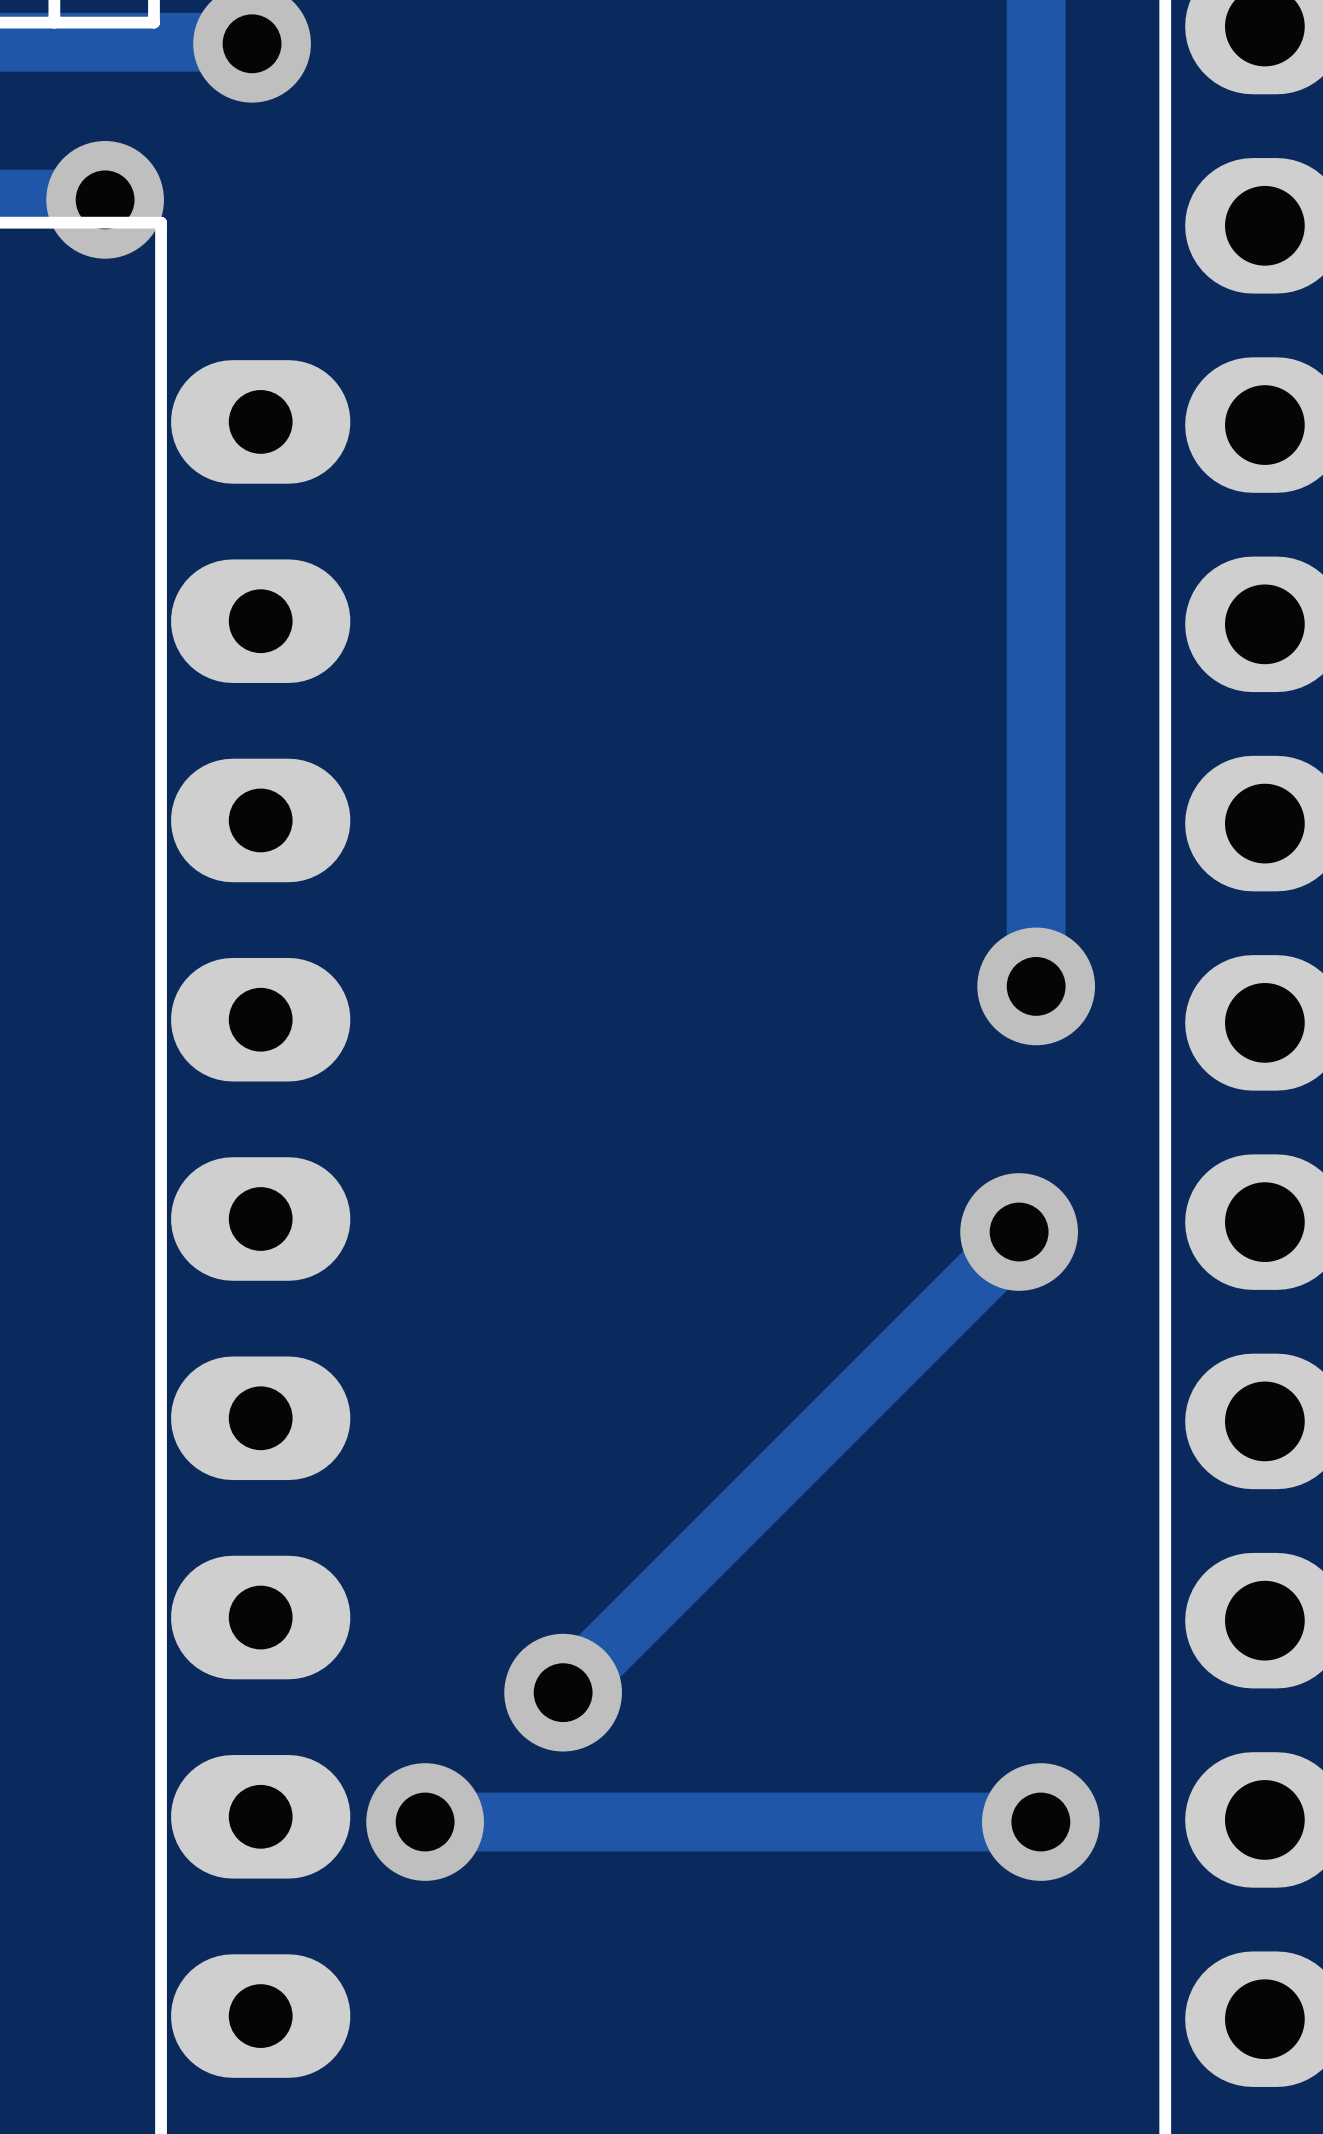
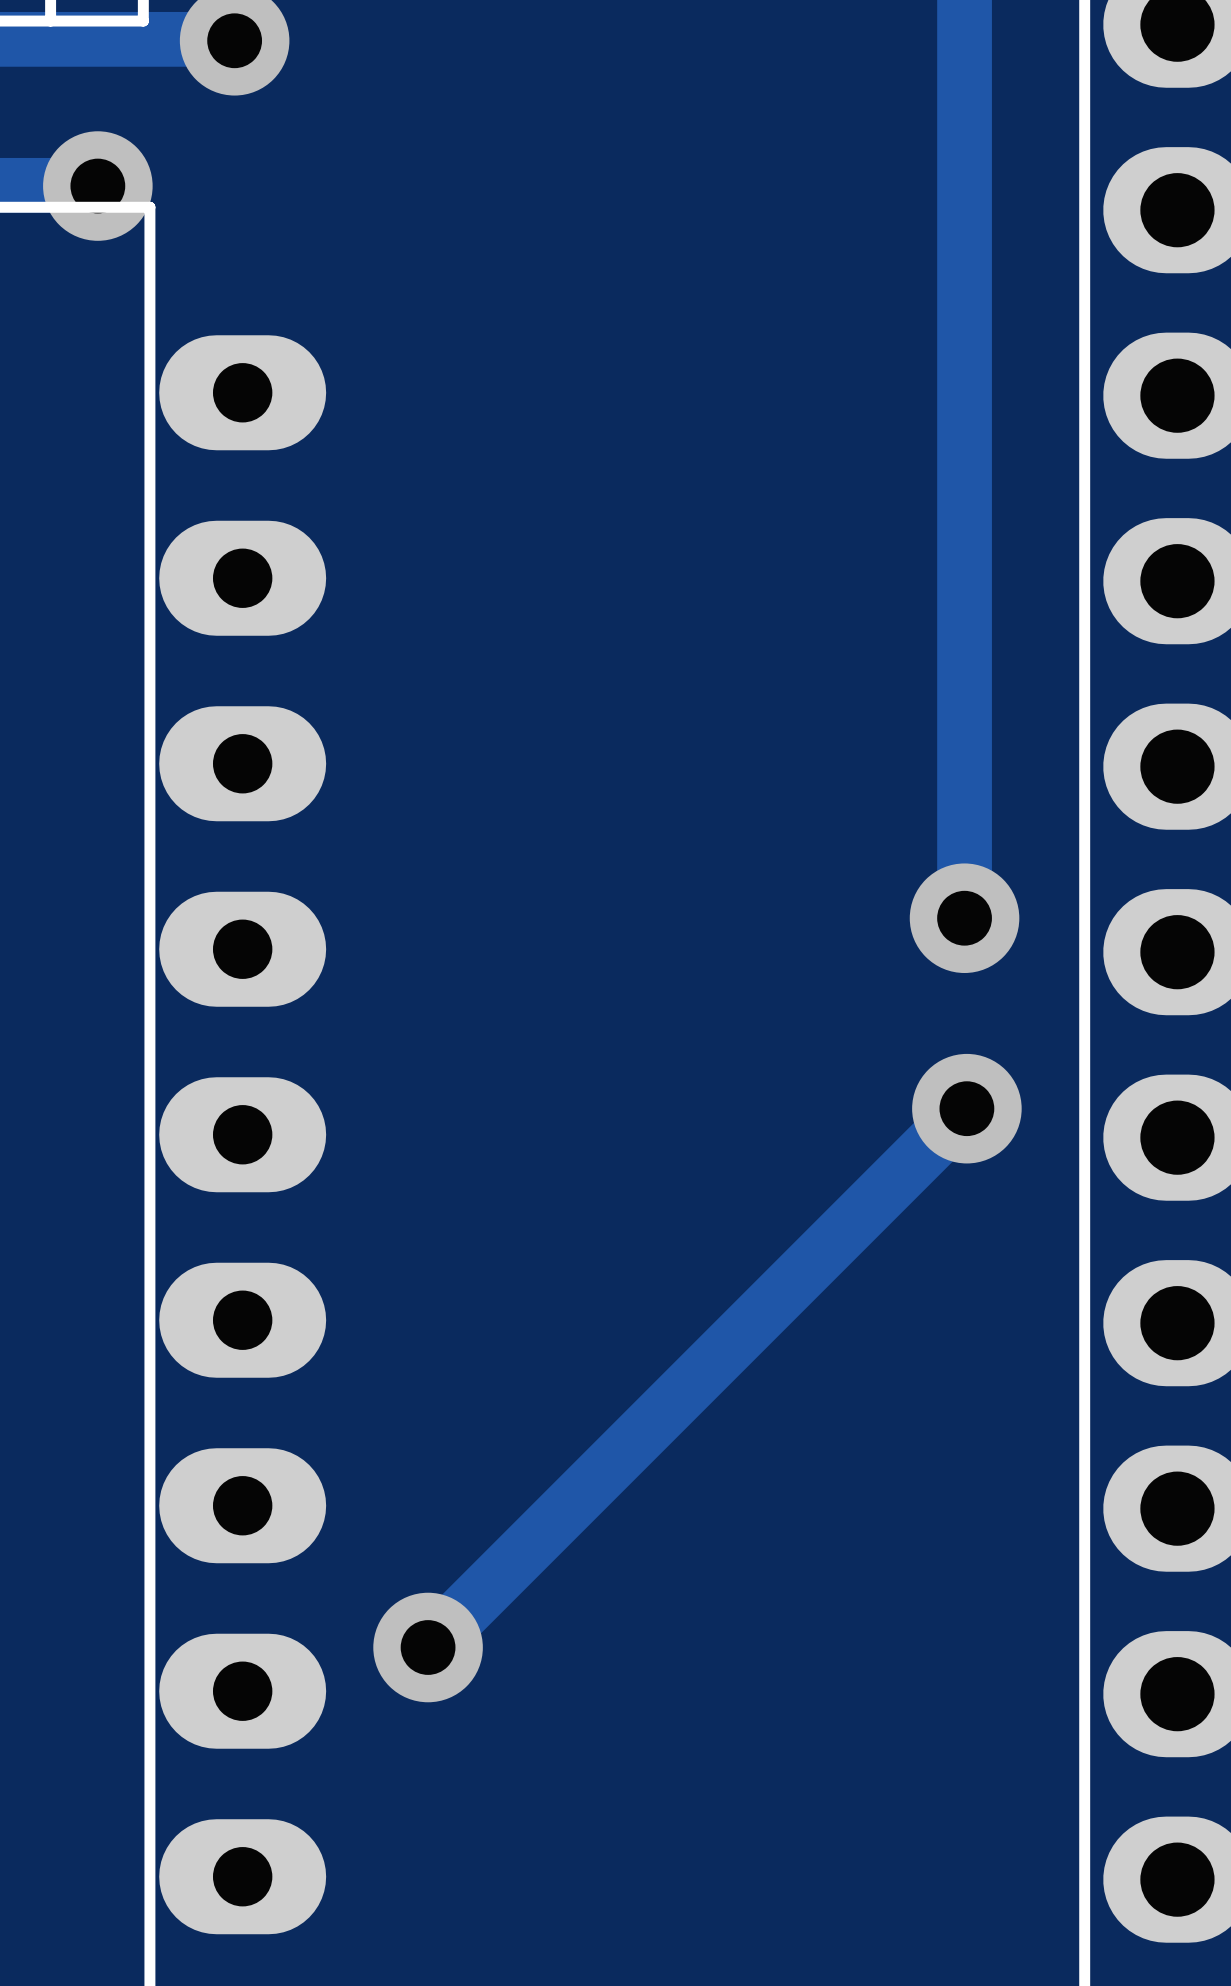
track: none -> (966, 1108) (428, 1647)
track: (1019, 1232) (1019, 1236) (563, 1692) -> none
via position: (1019, 1232) -> (966, 1108)
via: (563, 1692) -> none
track: (425, 1822) (1040, 1822) -> none
via position: (425, 1822) -> (428, 1647)
via: (1040, 1822) -> none

